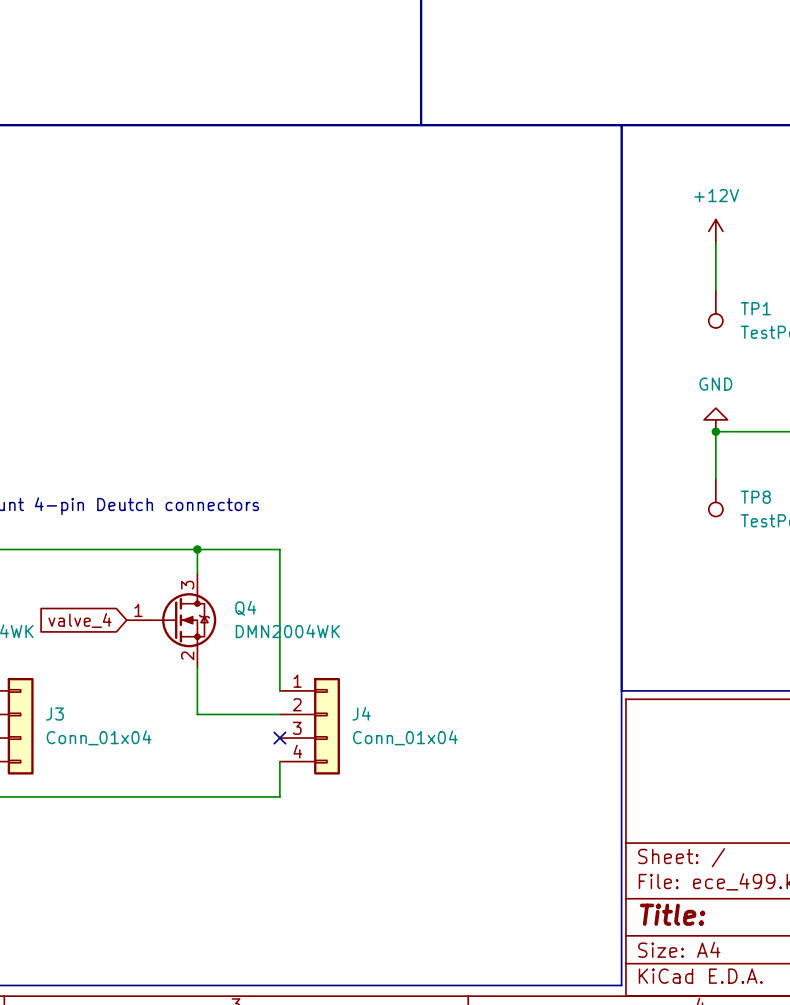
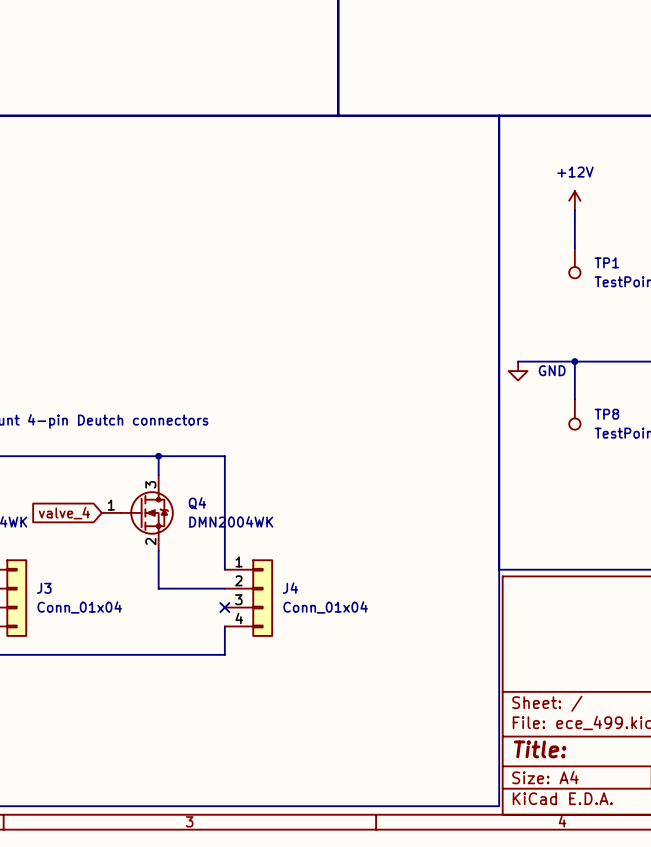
power symbol text position: GND (715, 384) -> GND (552, 370)
power symbol rotation: 0° (715, 419) -> 180° (518, 371)
power symbol position: GND (715, 419) -> GND (518, 371)
wire: none -> (518, 361) (574, 361)

